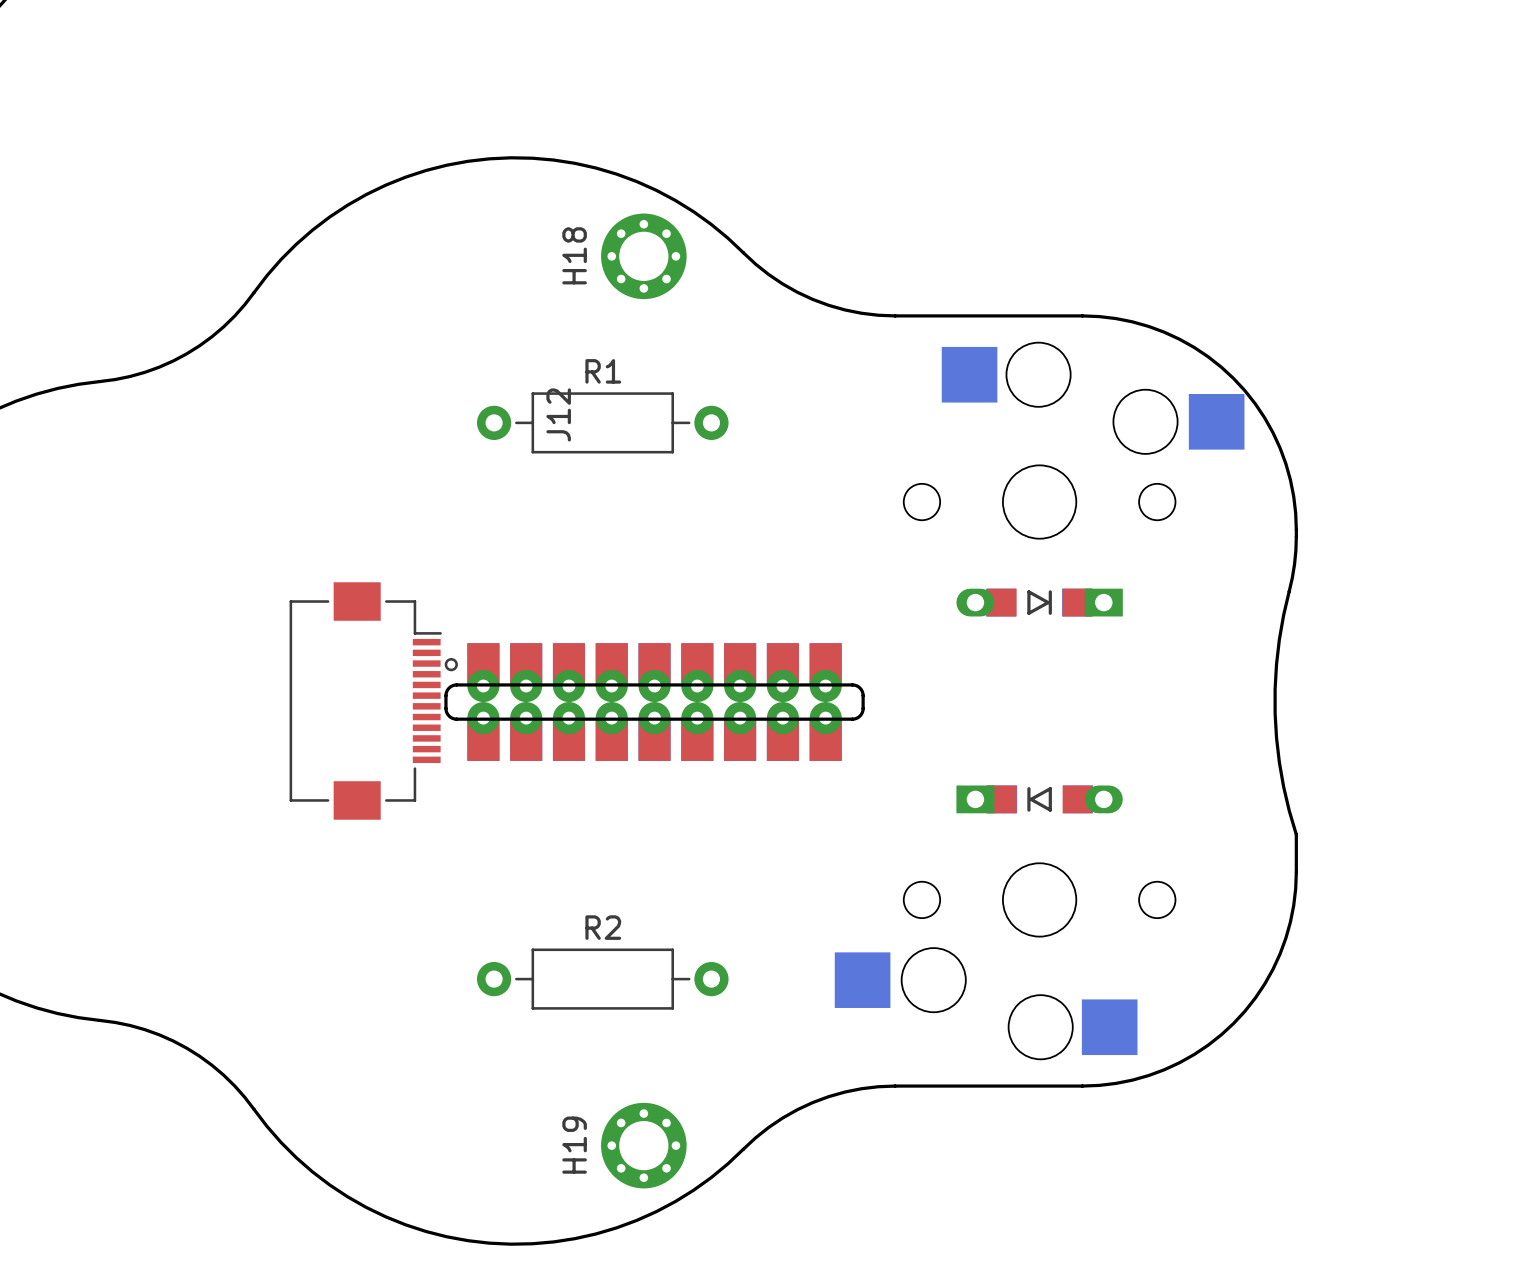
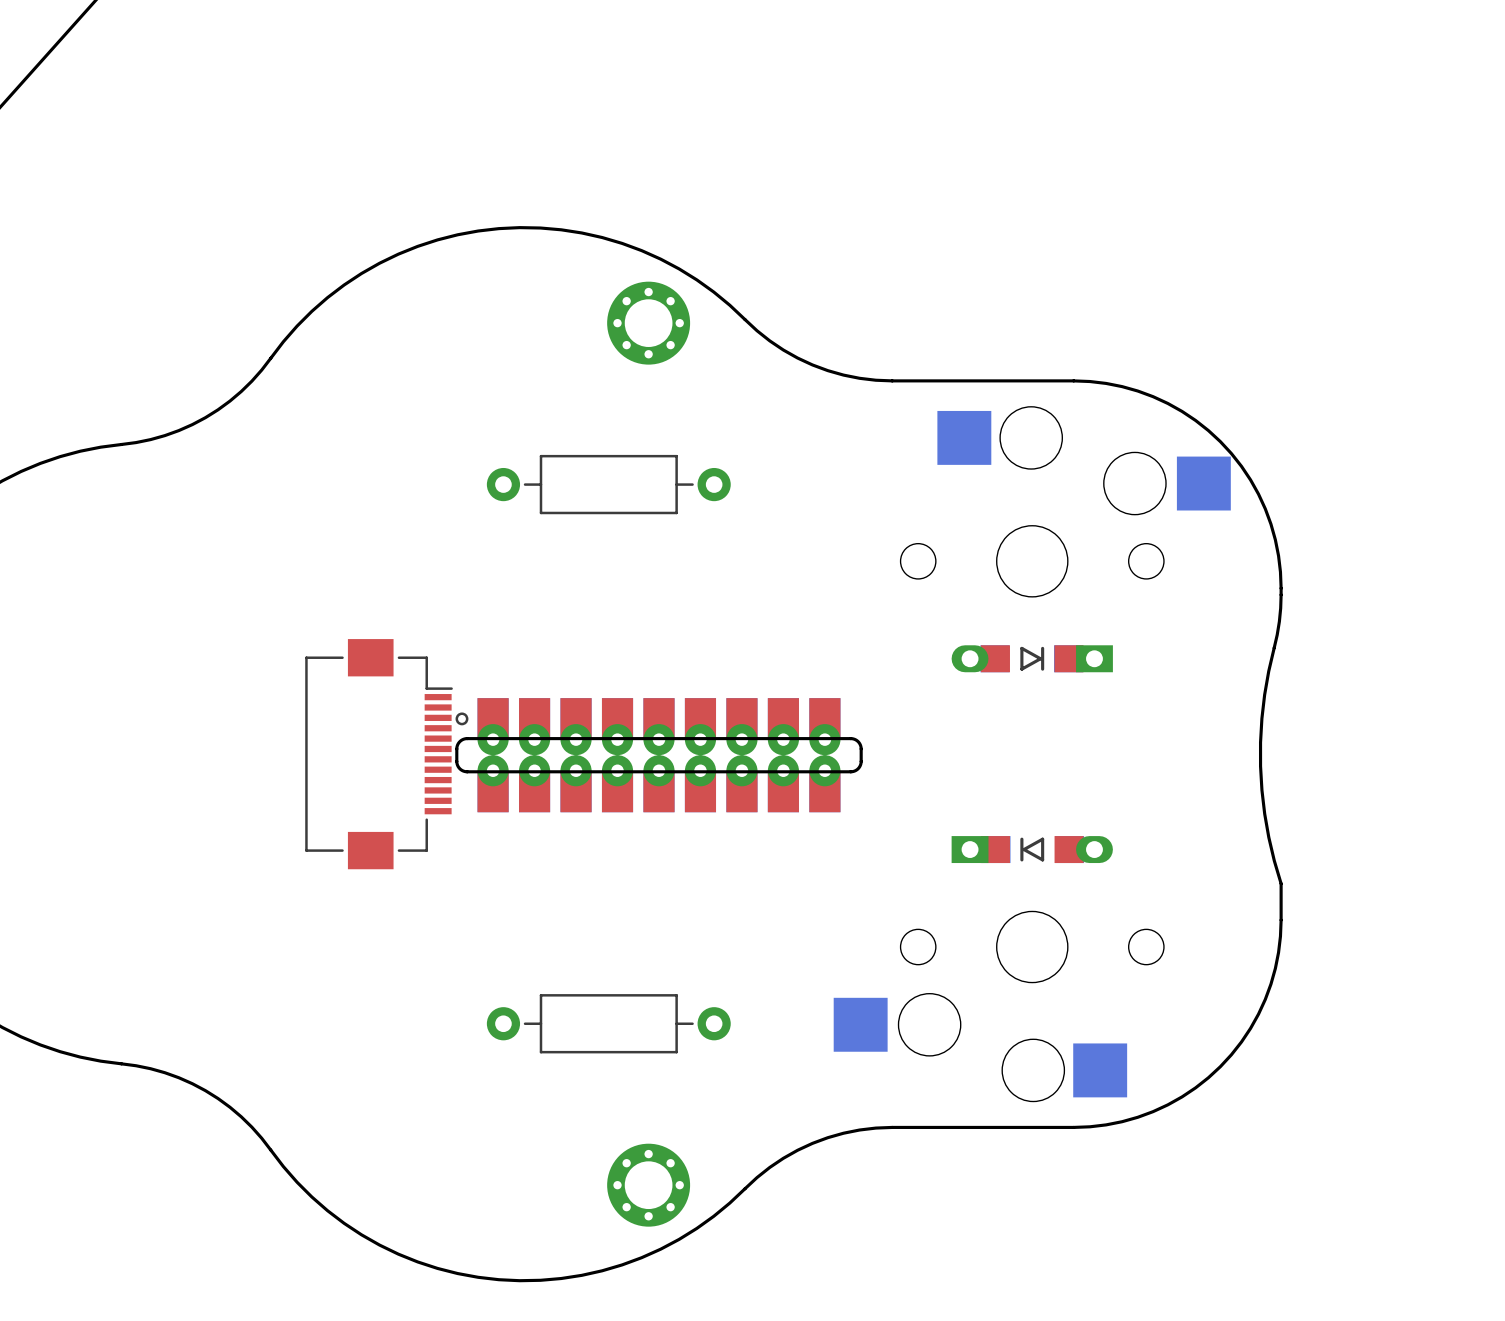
H18 name: H18 (574, 255) -> none
R1 name: R1 (603, 371) -> none
J12 name: J12 (558, 414) -> none
R2 name: R2 (603, 927) -> none
H19 name: H19 (574, 1145) -> none

